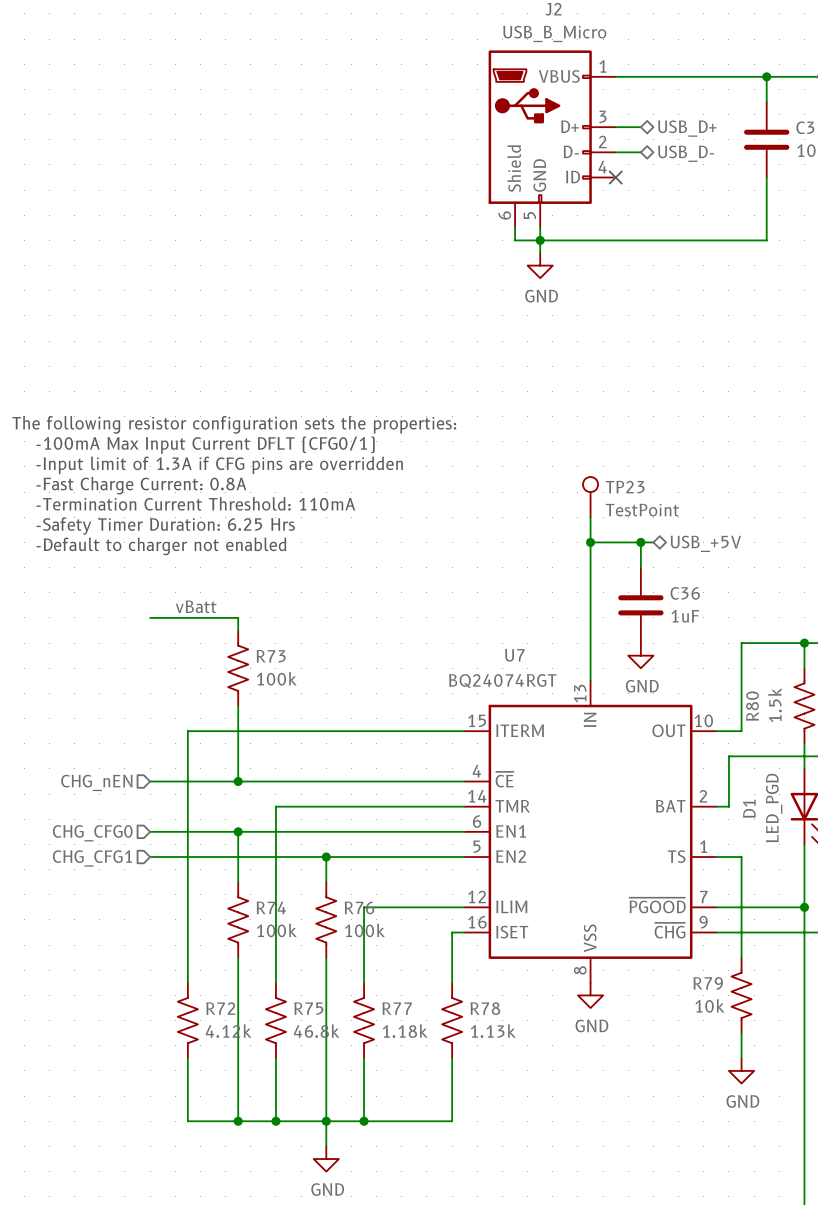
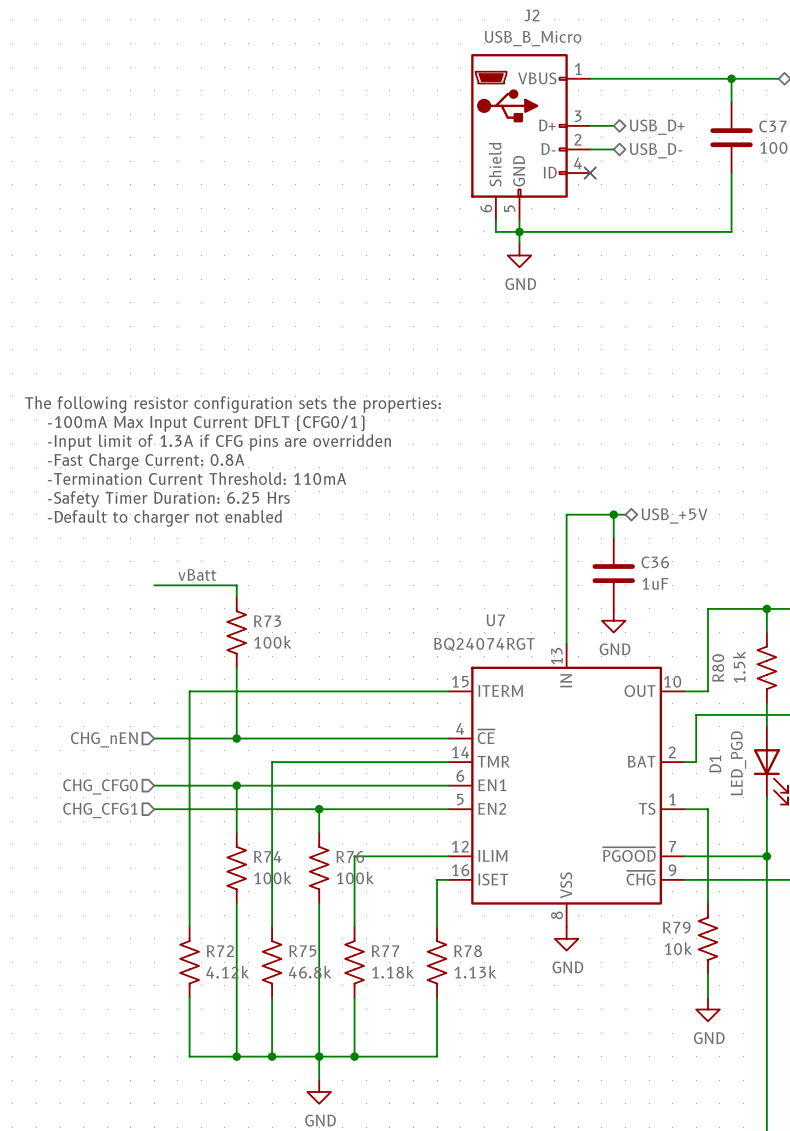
TP23: TestPoint (590, 497) -> none
wire: (590, 517) (590, 542) -> none
junction: (590, 542) -> none

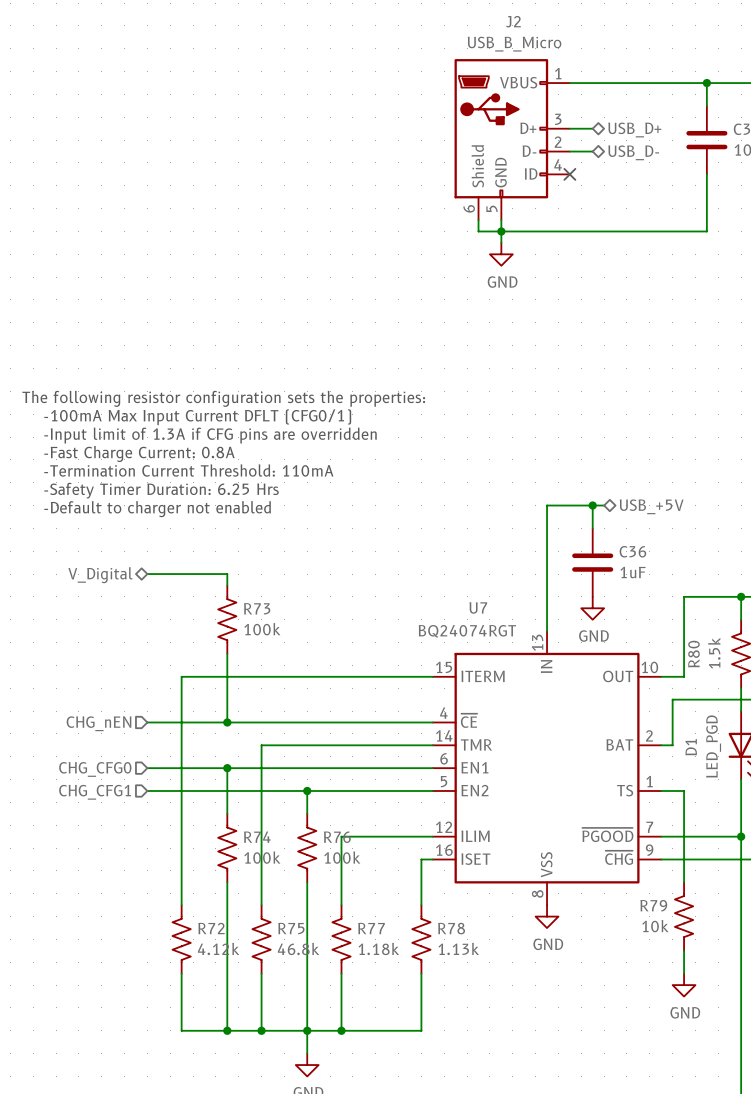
label: vBatt (197, 574) -> none
hierarchical label: none -> V_Digital (100, 575)

